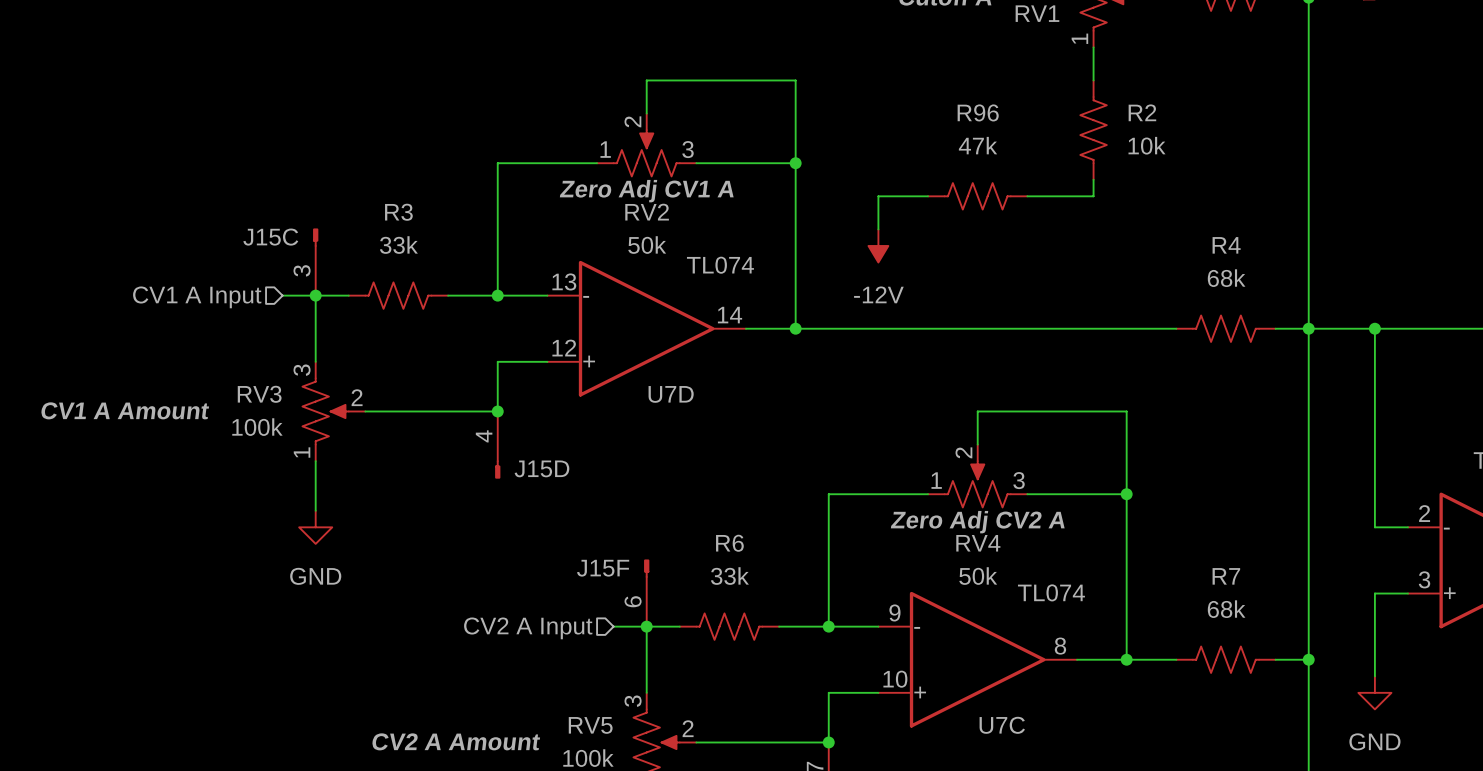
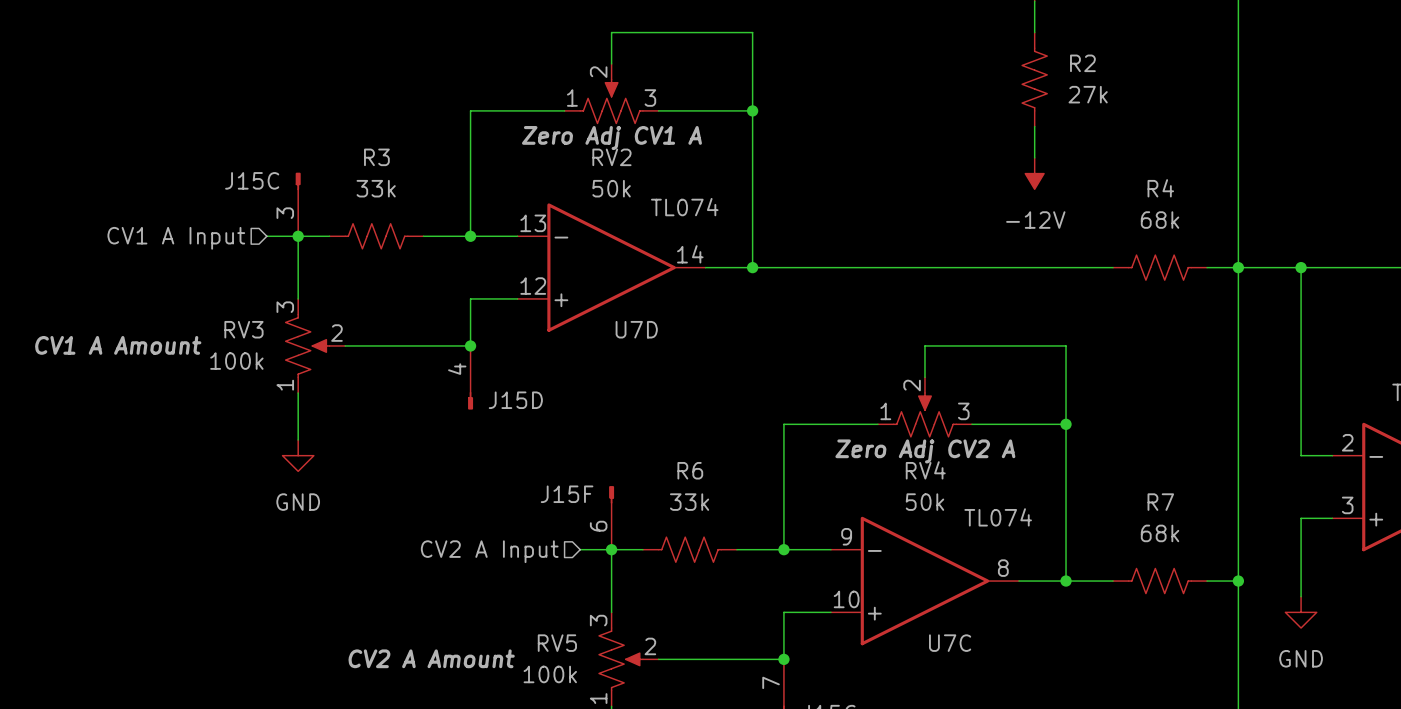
R2 value: 10k (1146, 145) -> 27k (1088, 94)
wire: (928, 196) (878, 196) (878, 229) -> none
R96: 47k (977, 196) -> none
wire: (1027, 196) (1093, 196) -> (1034, 157) (1034, 142)
power symbol position: -12V (878, 245) -> -12V (1034, 173)

